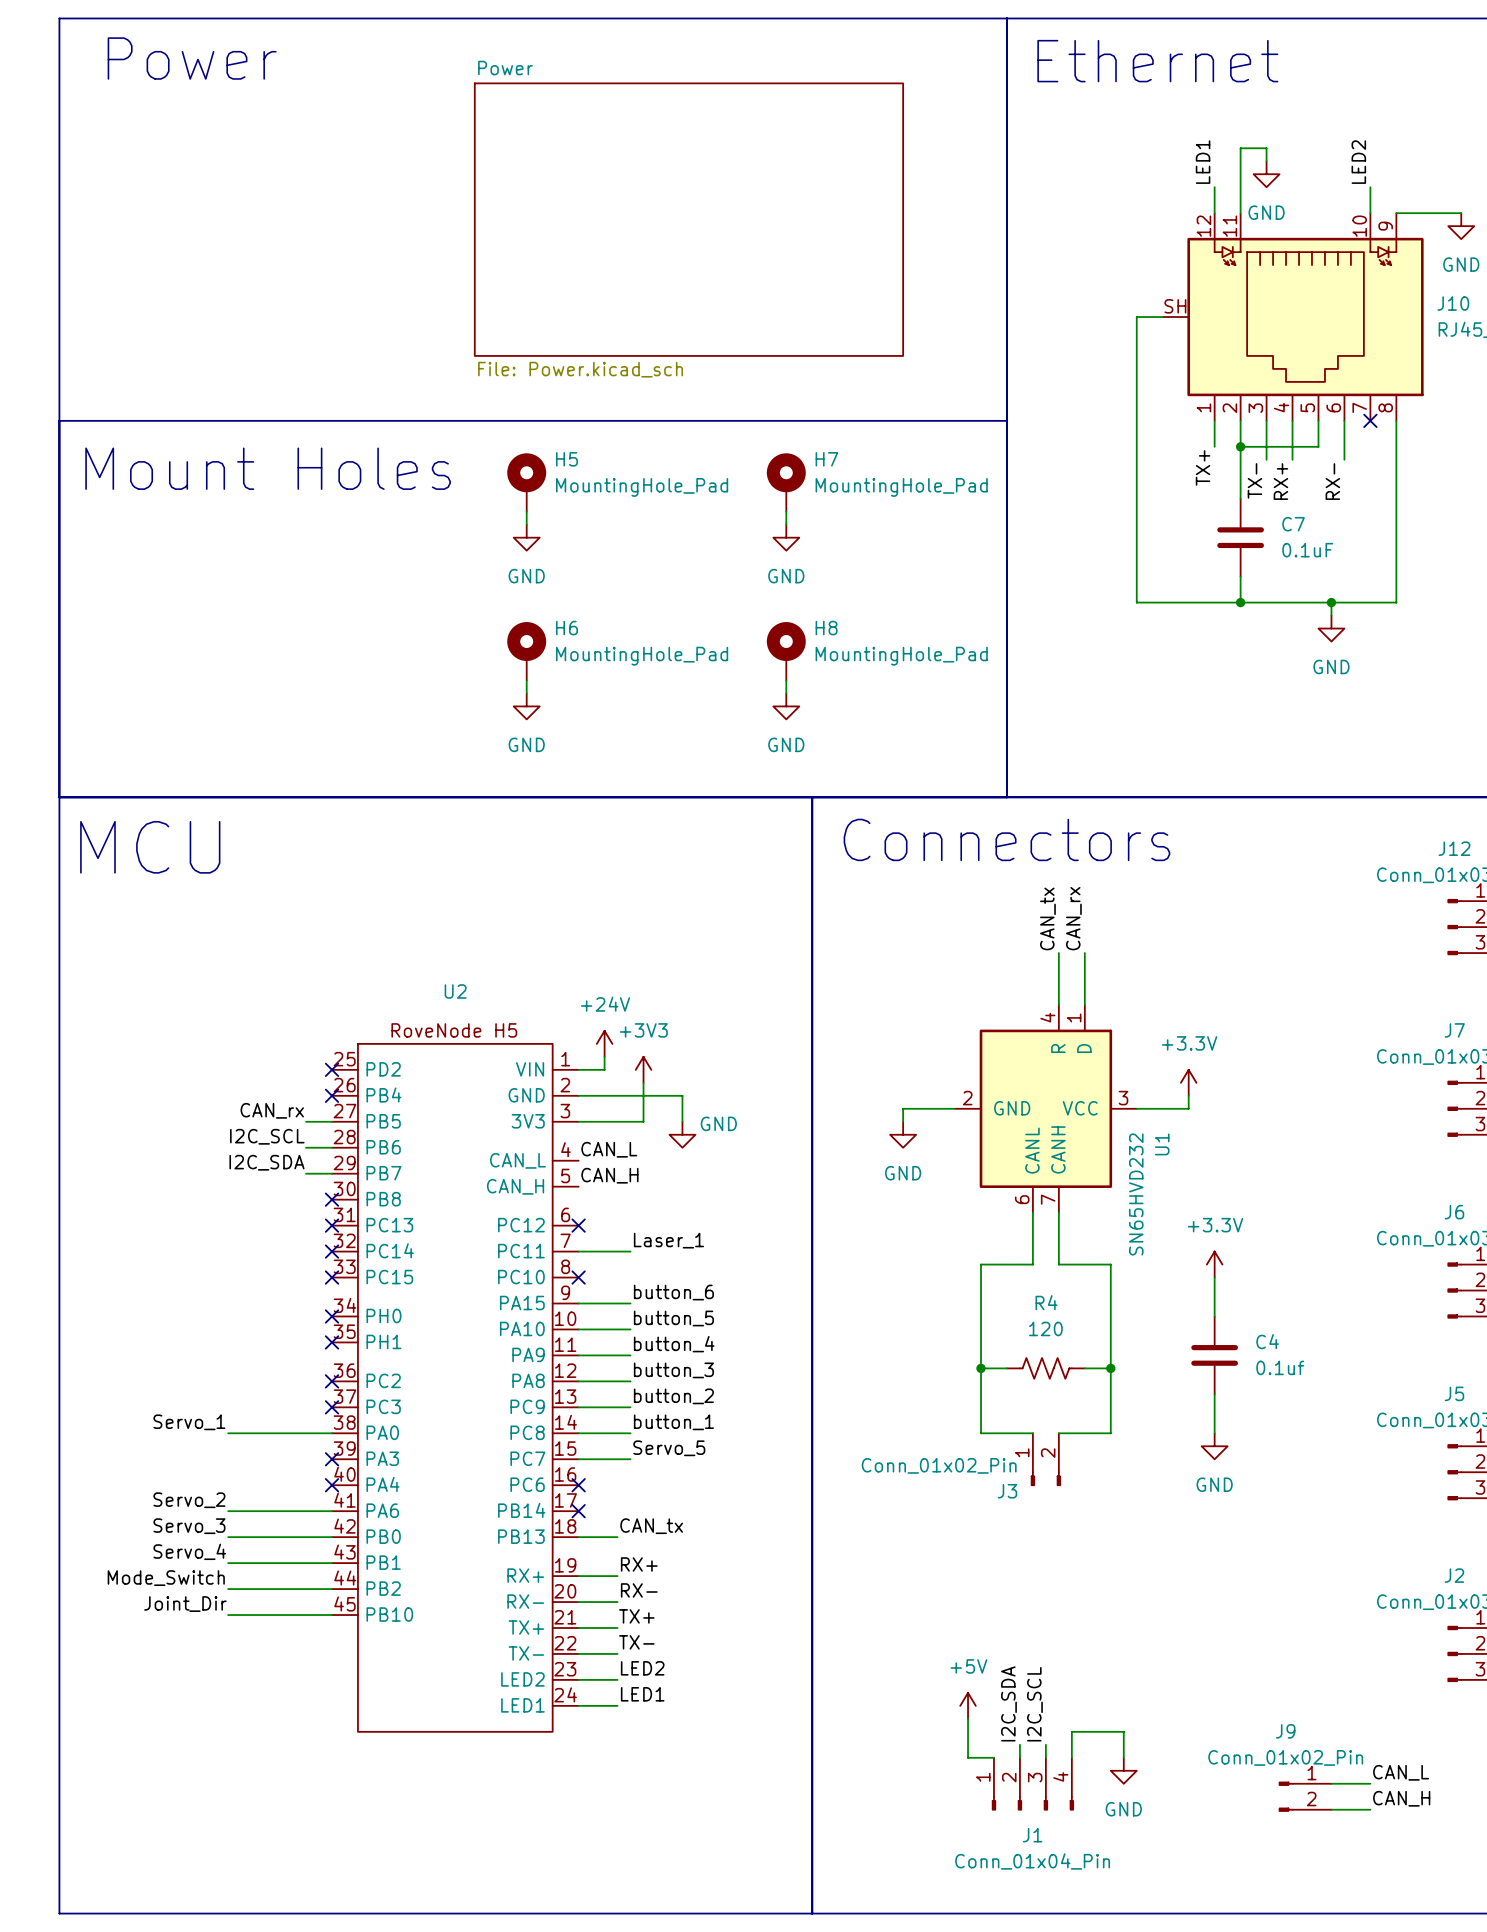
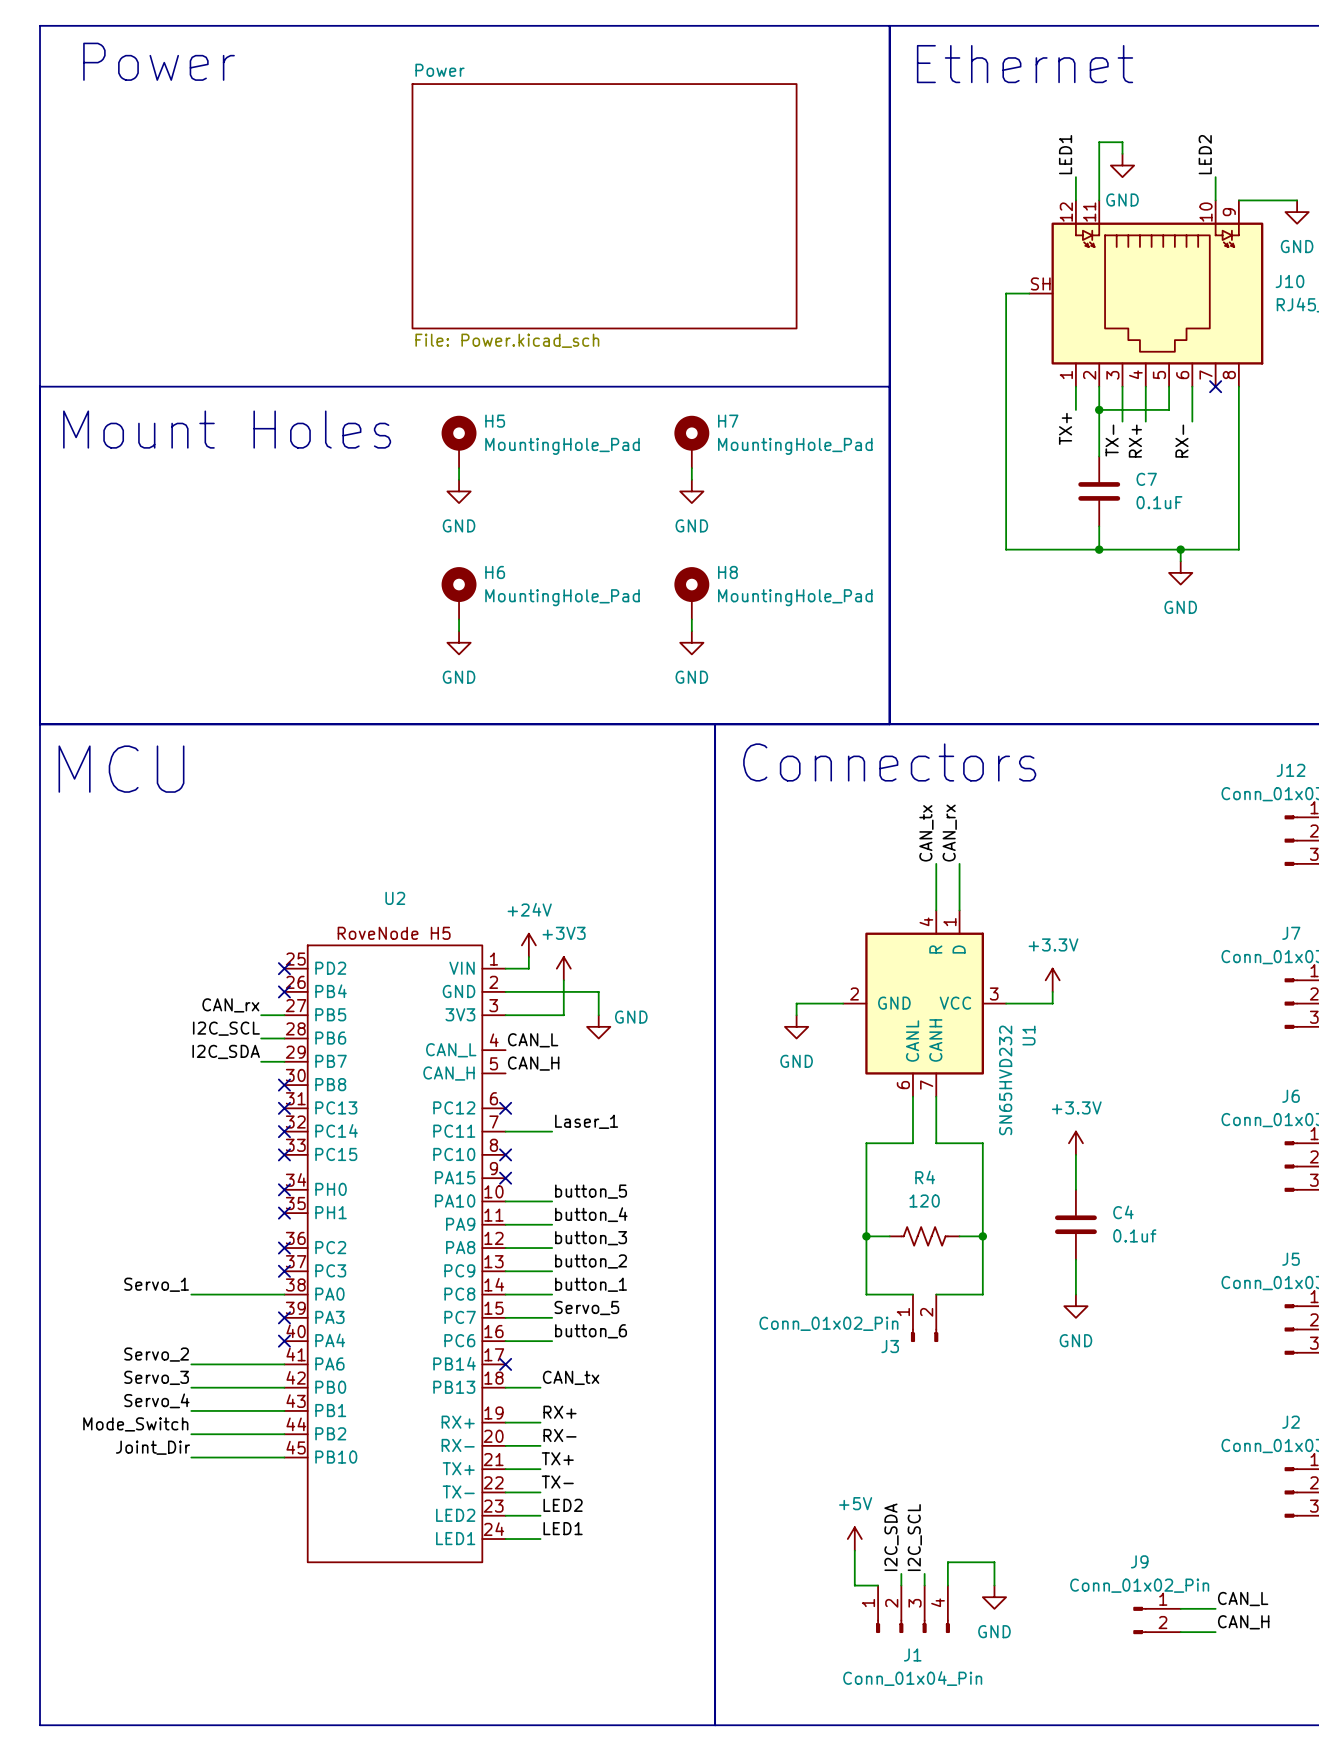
label position: button_6 (673, 1292) -> button_6 (591, 1331)
wire: (578, 1303) (630, 1303) -> (505, 1341) (552, 1341)
no-connect mark: none -> (505, 1178)
no-connect mark: (578, 1485) -> none

